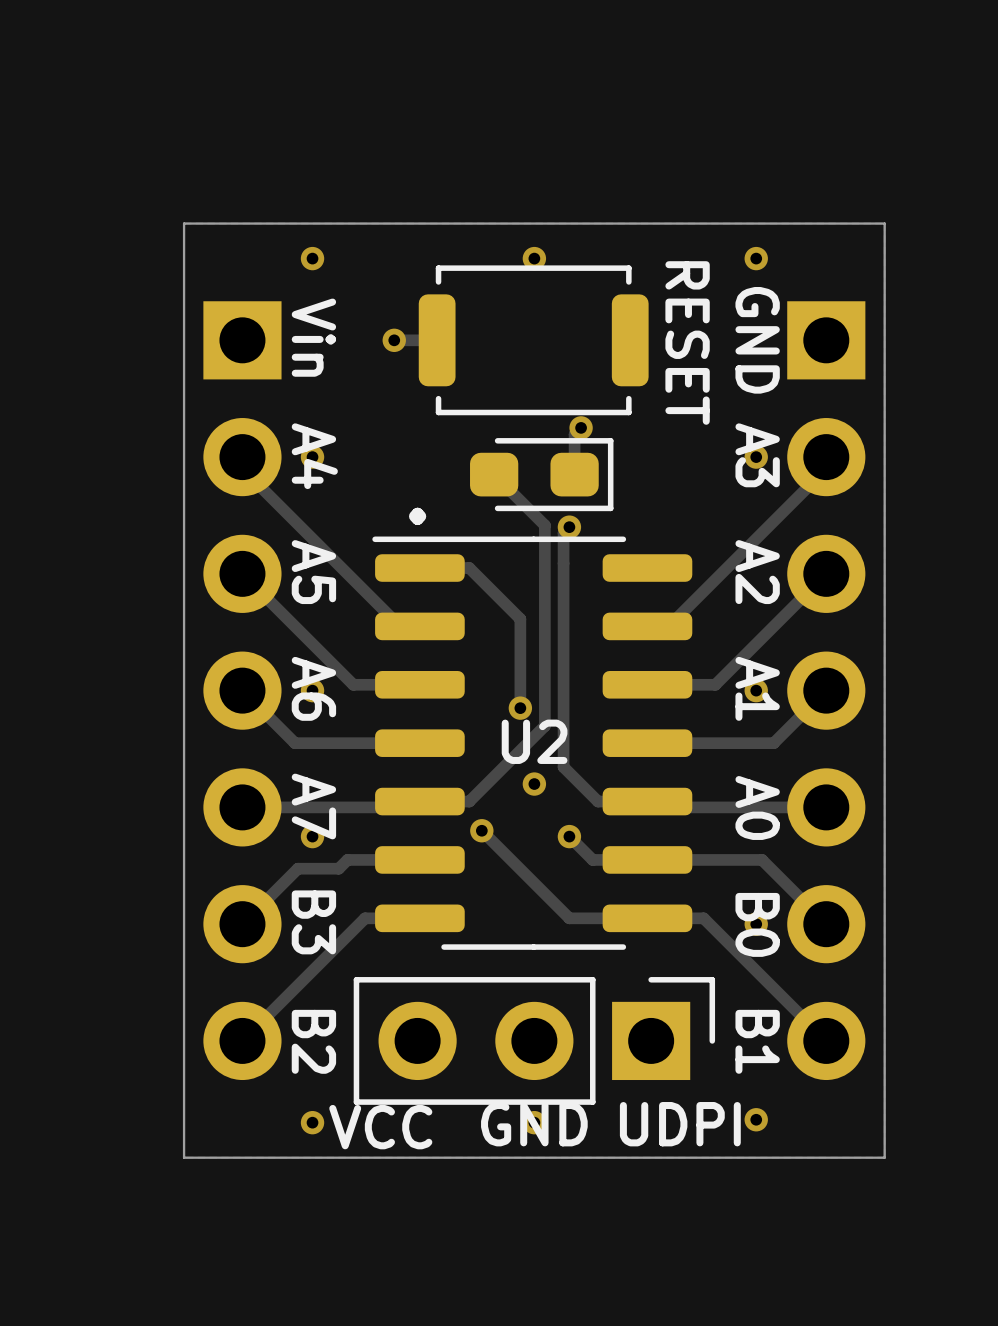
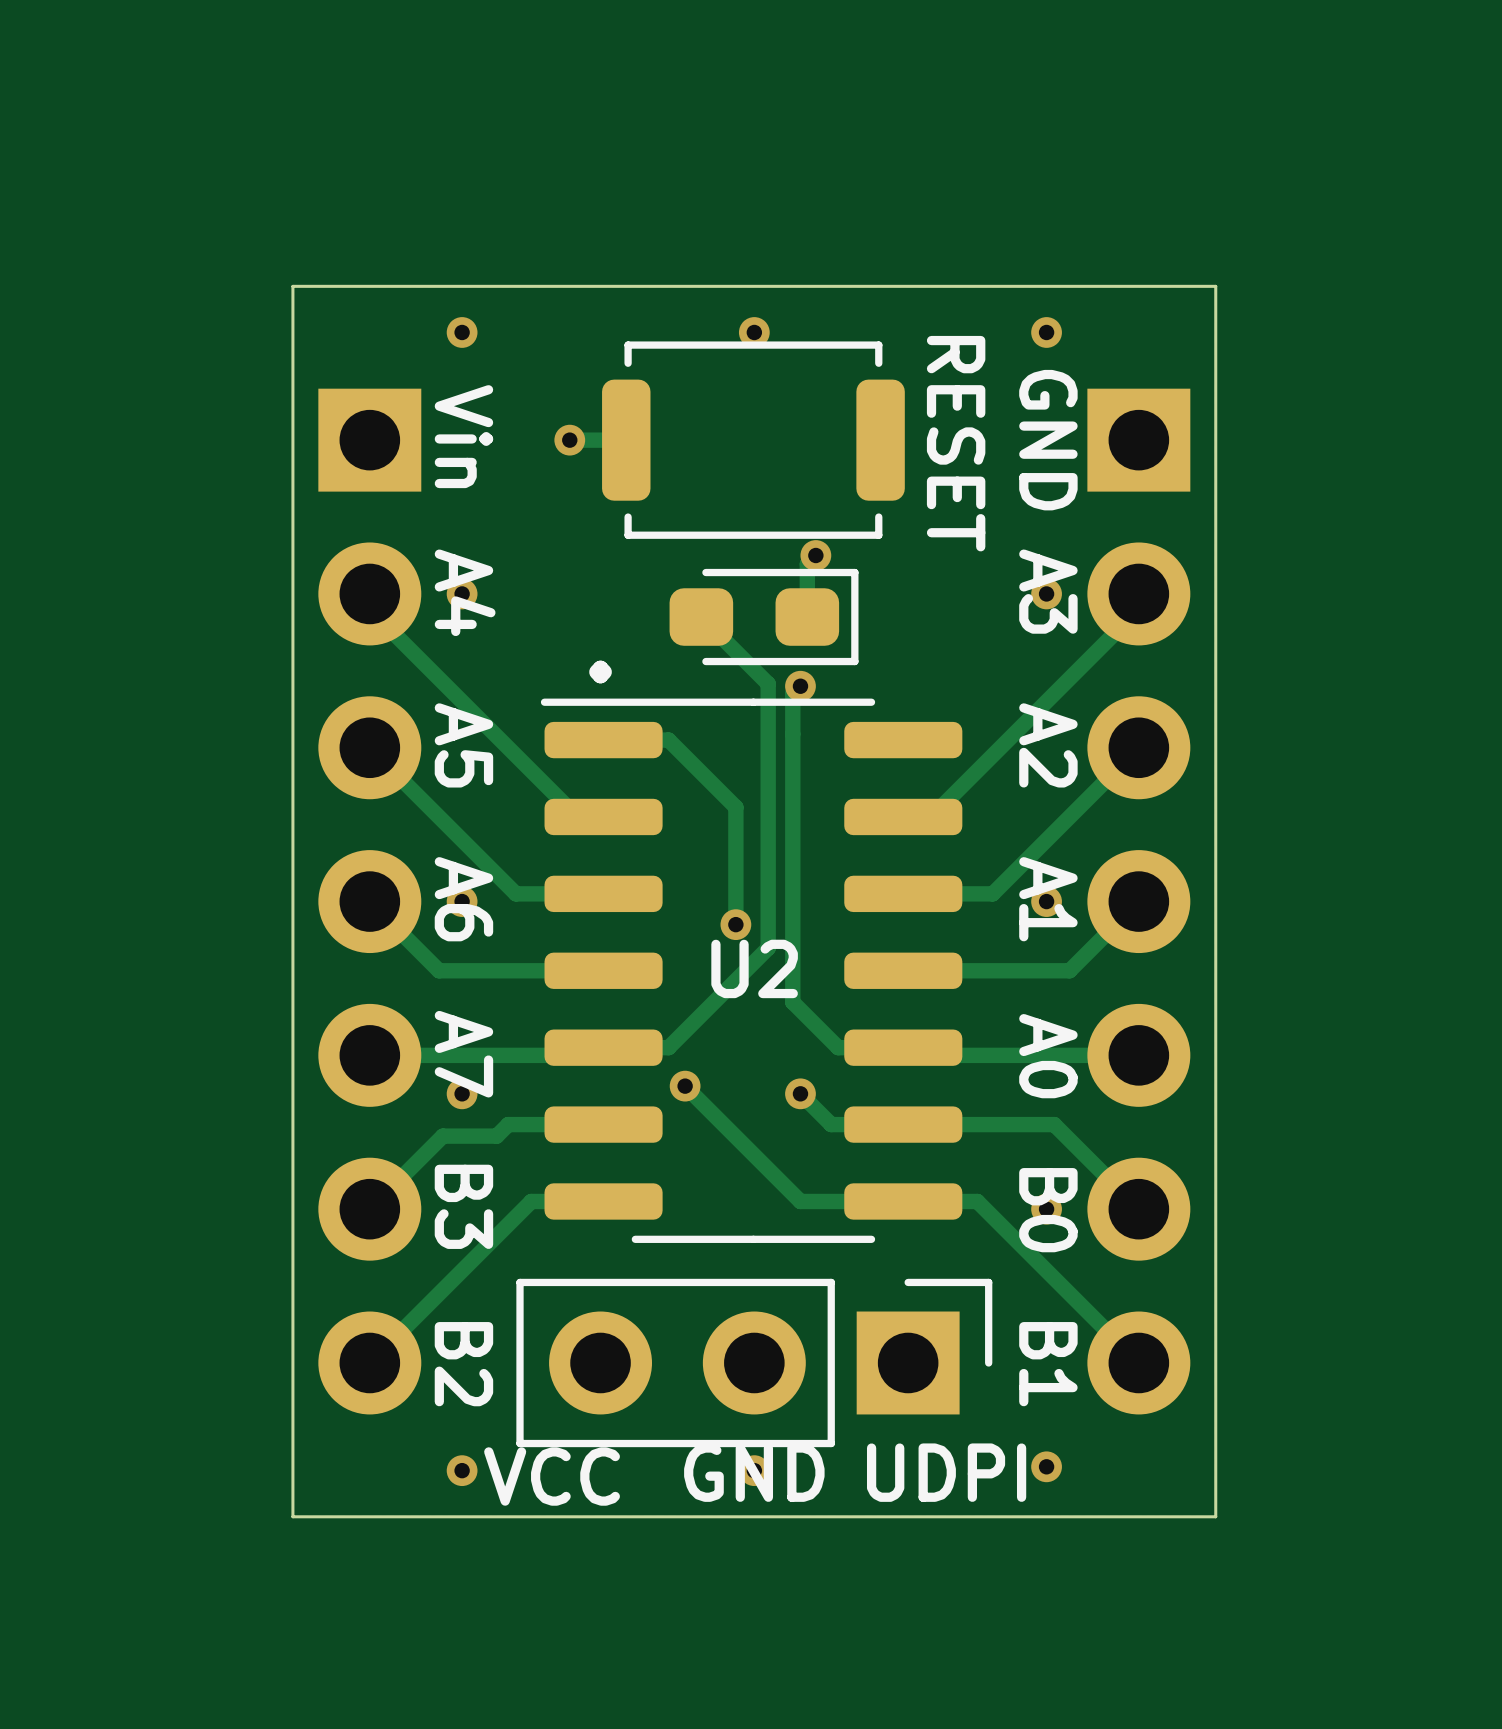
via: (534, 784) -> none

